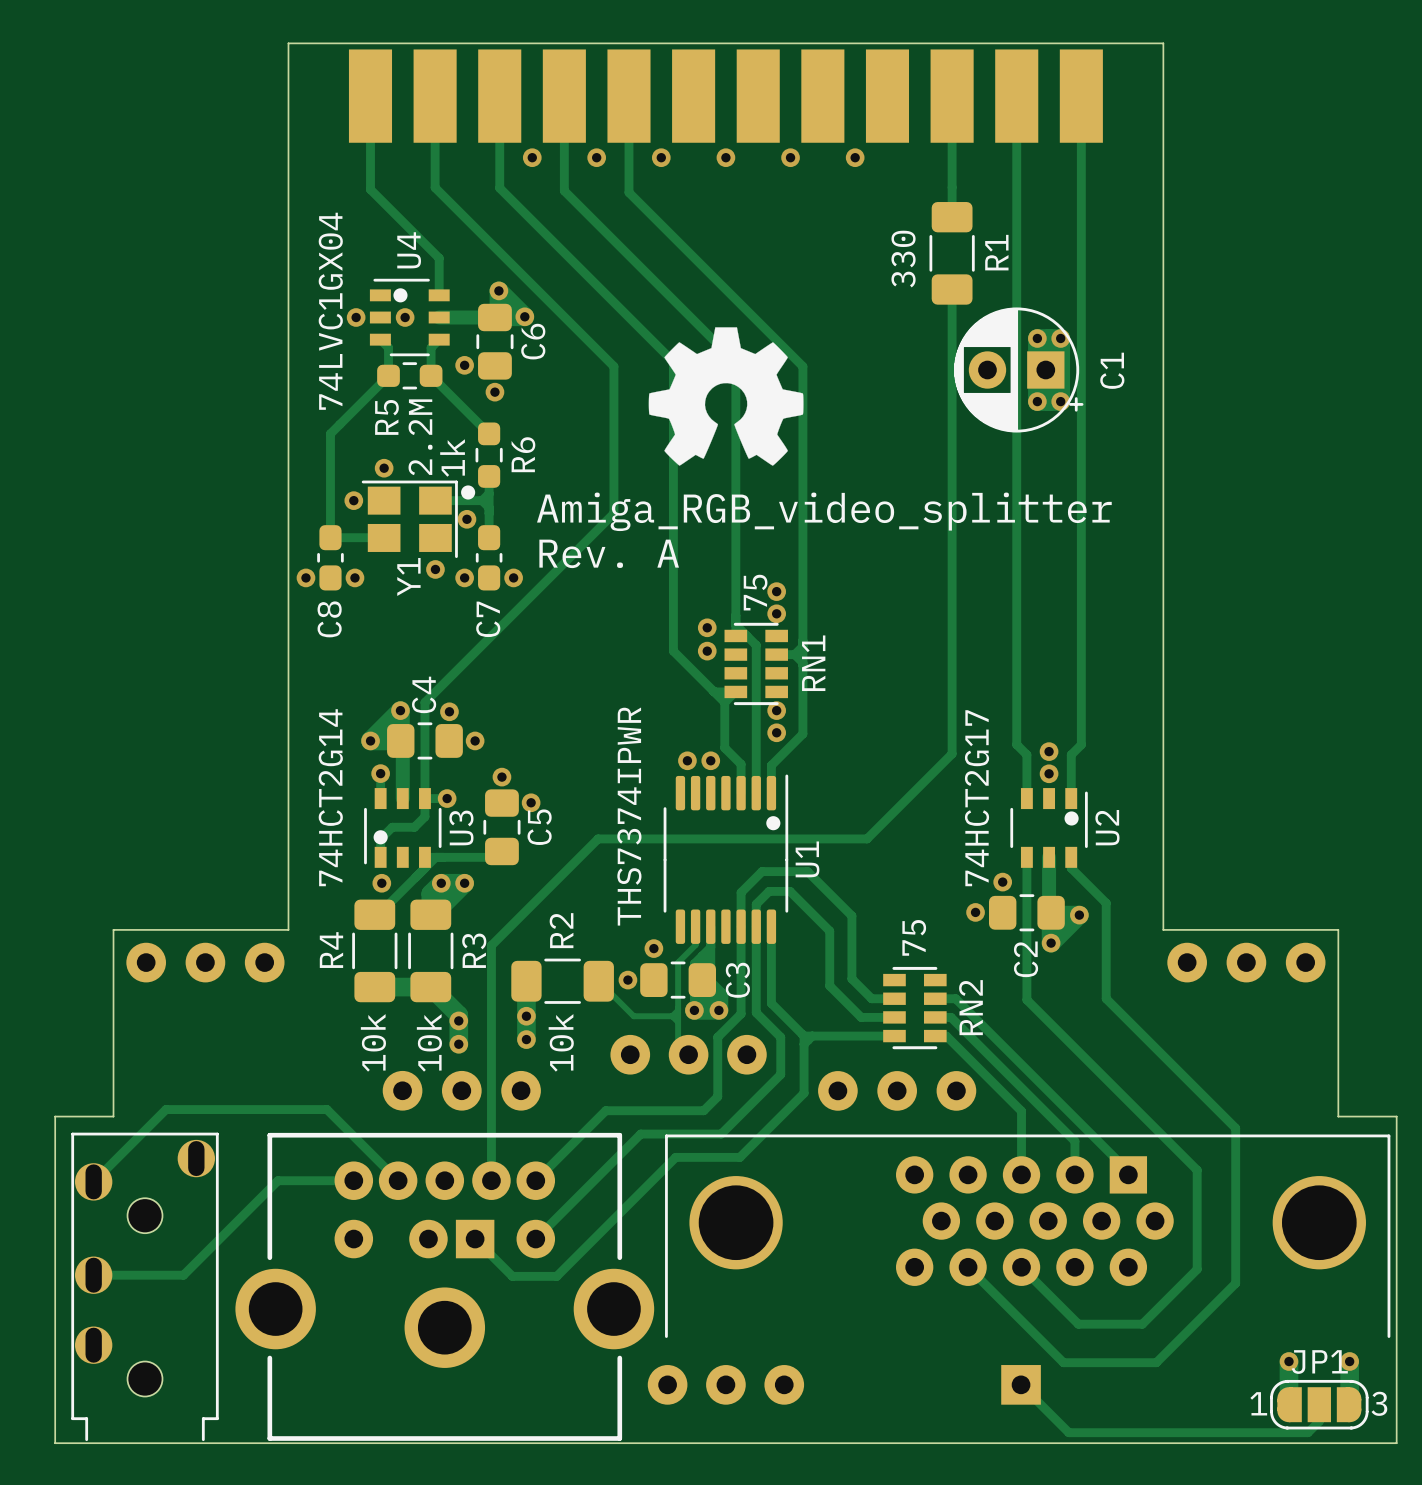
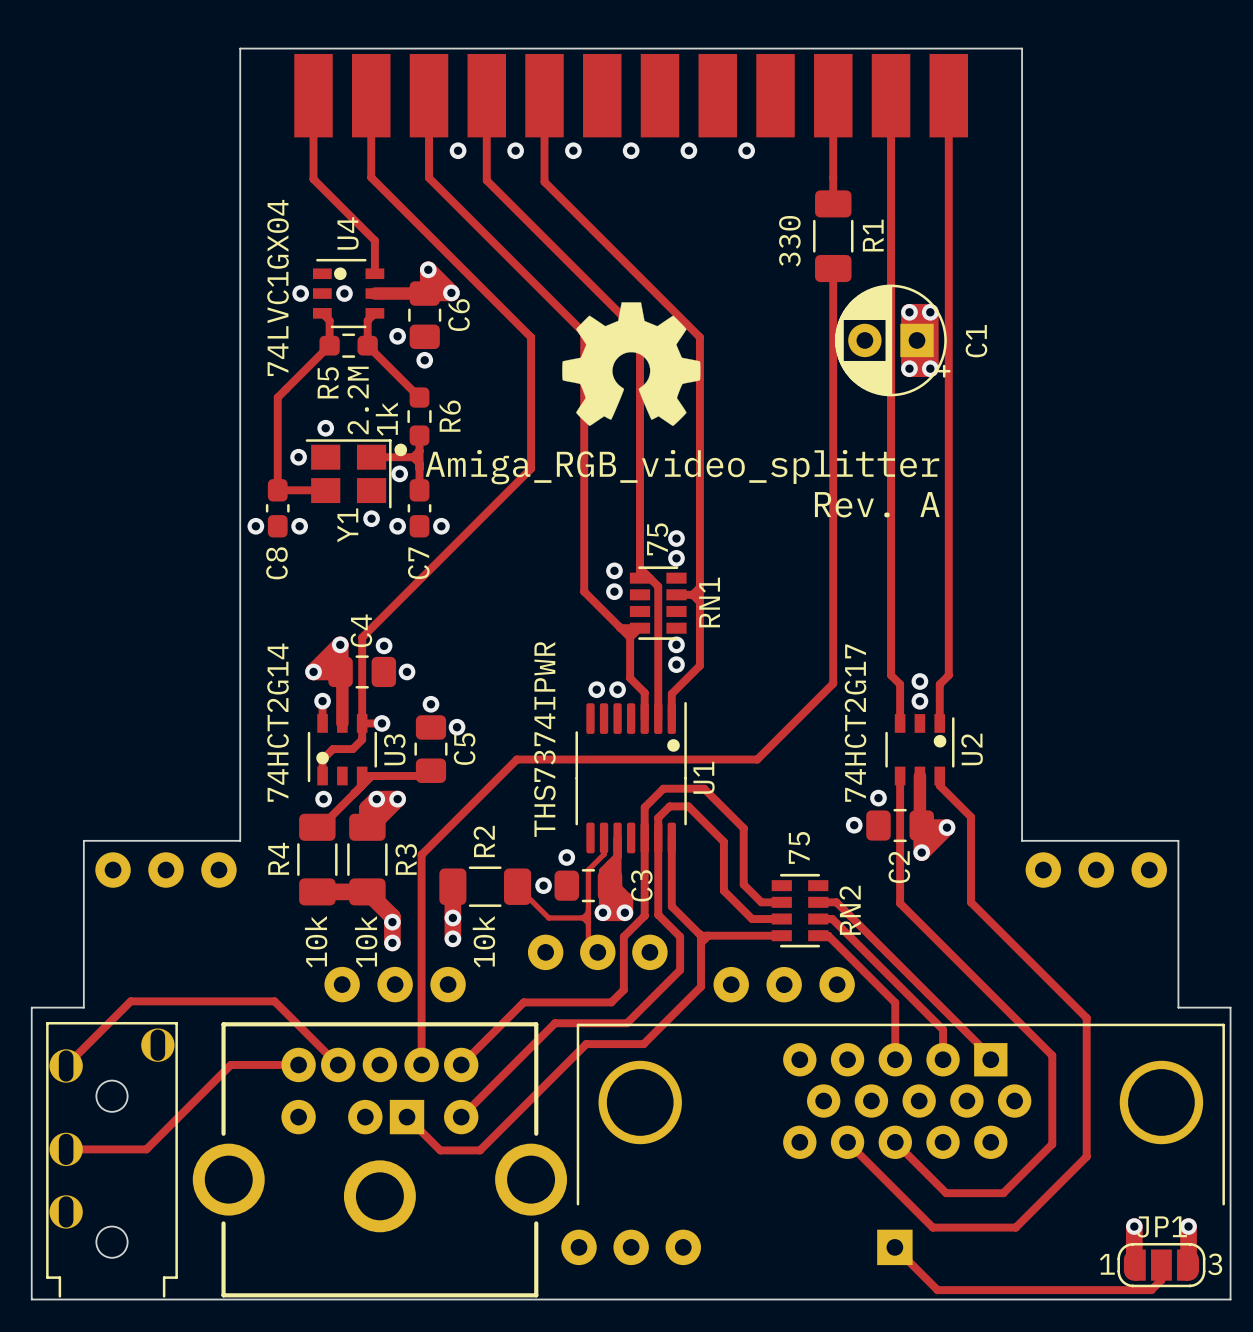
text position: Amiga_RGB_video_splitter (824, 511) -> Amiga_RGB_video_splitter (682, 467)
text position: Rev. A (609, 553) -> Rev. A (877, 504)

